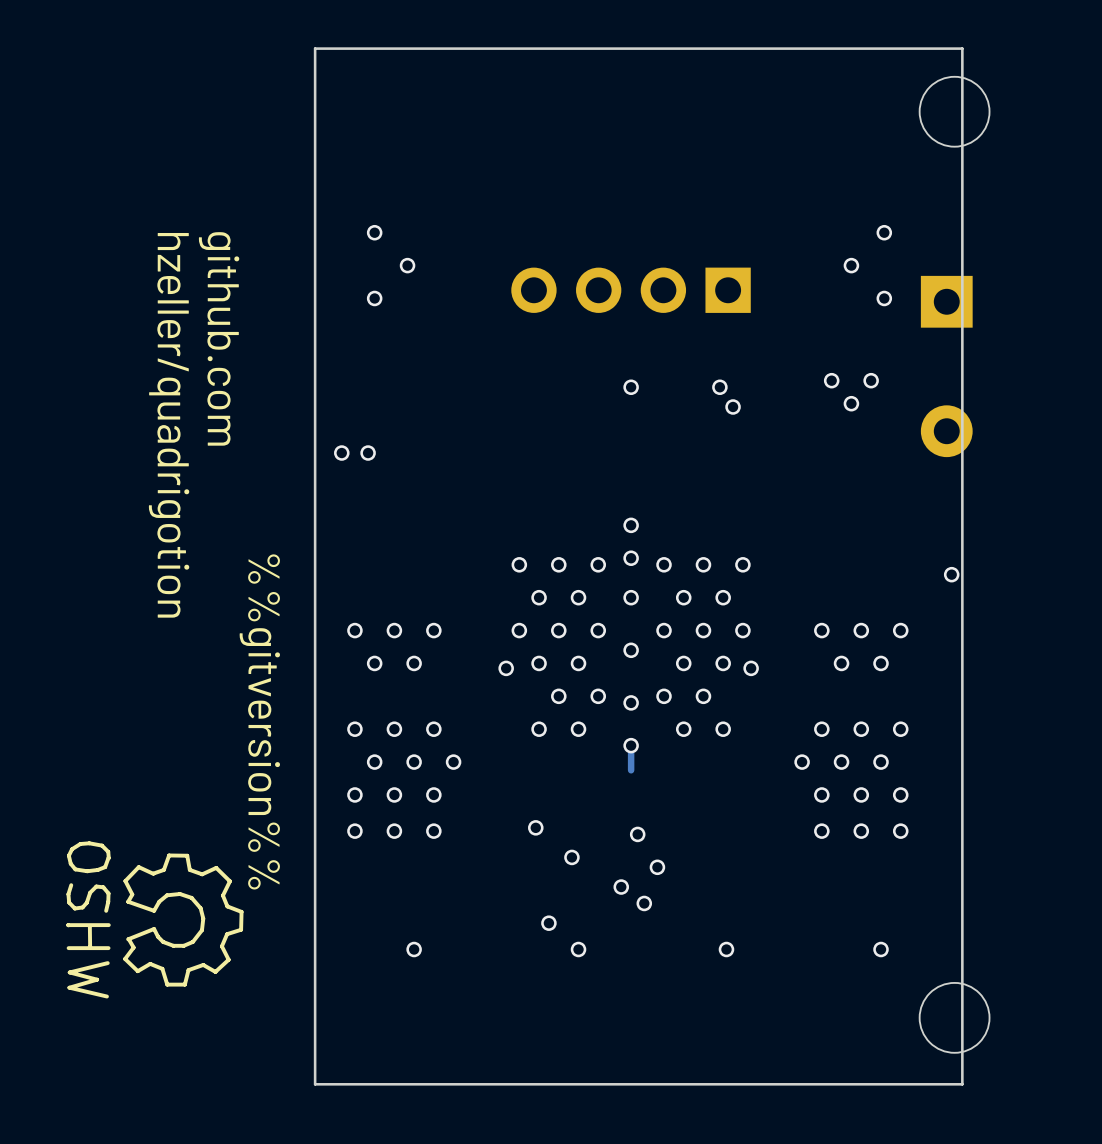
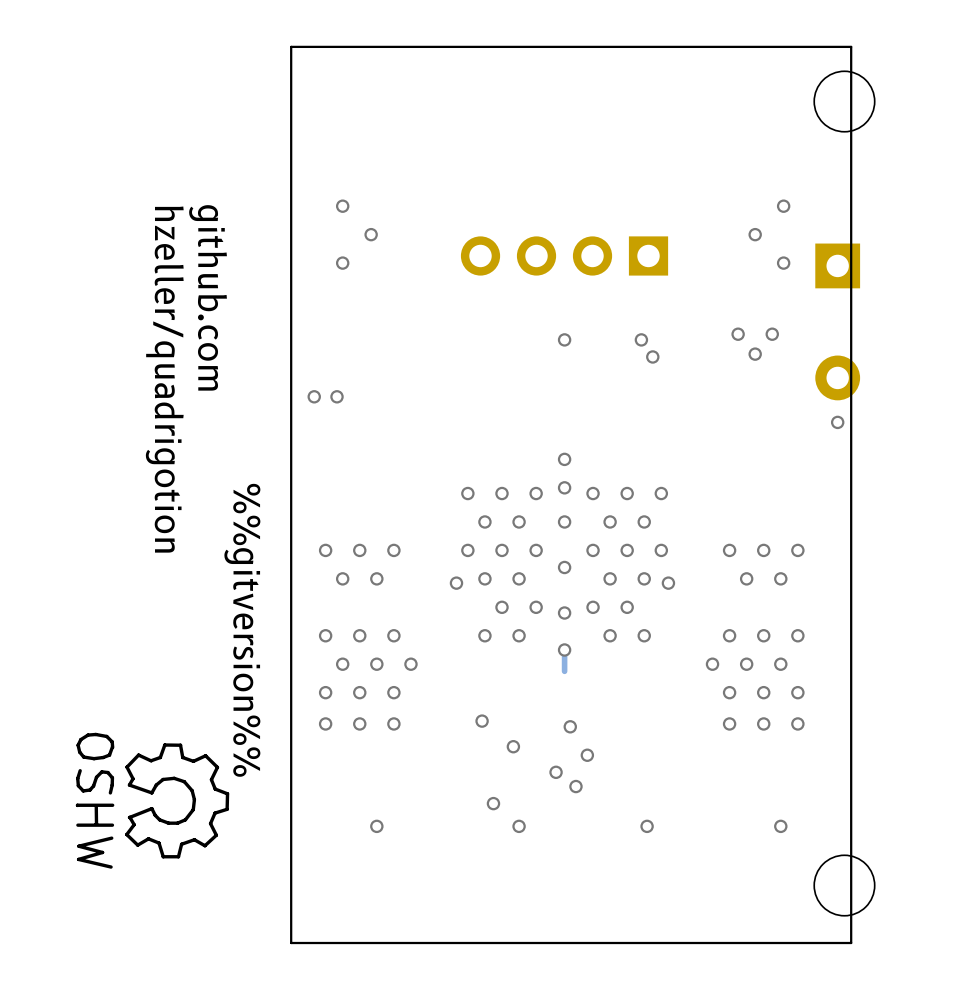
via position: (951, 574) -> (837, 422)

